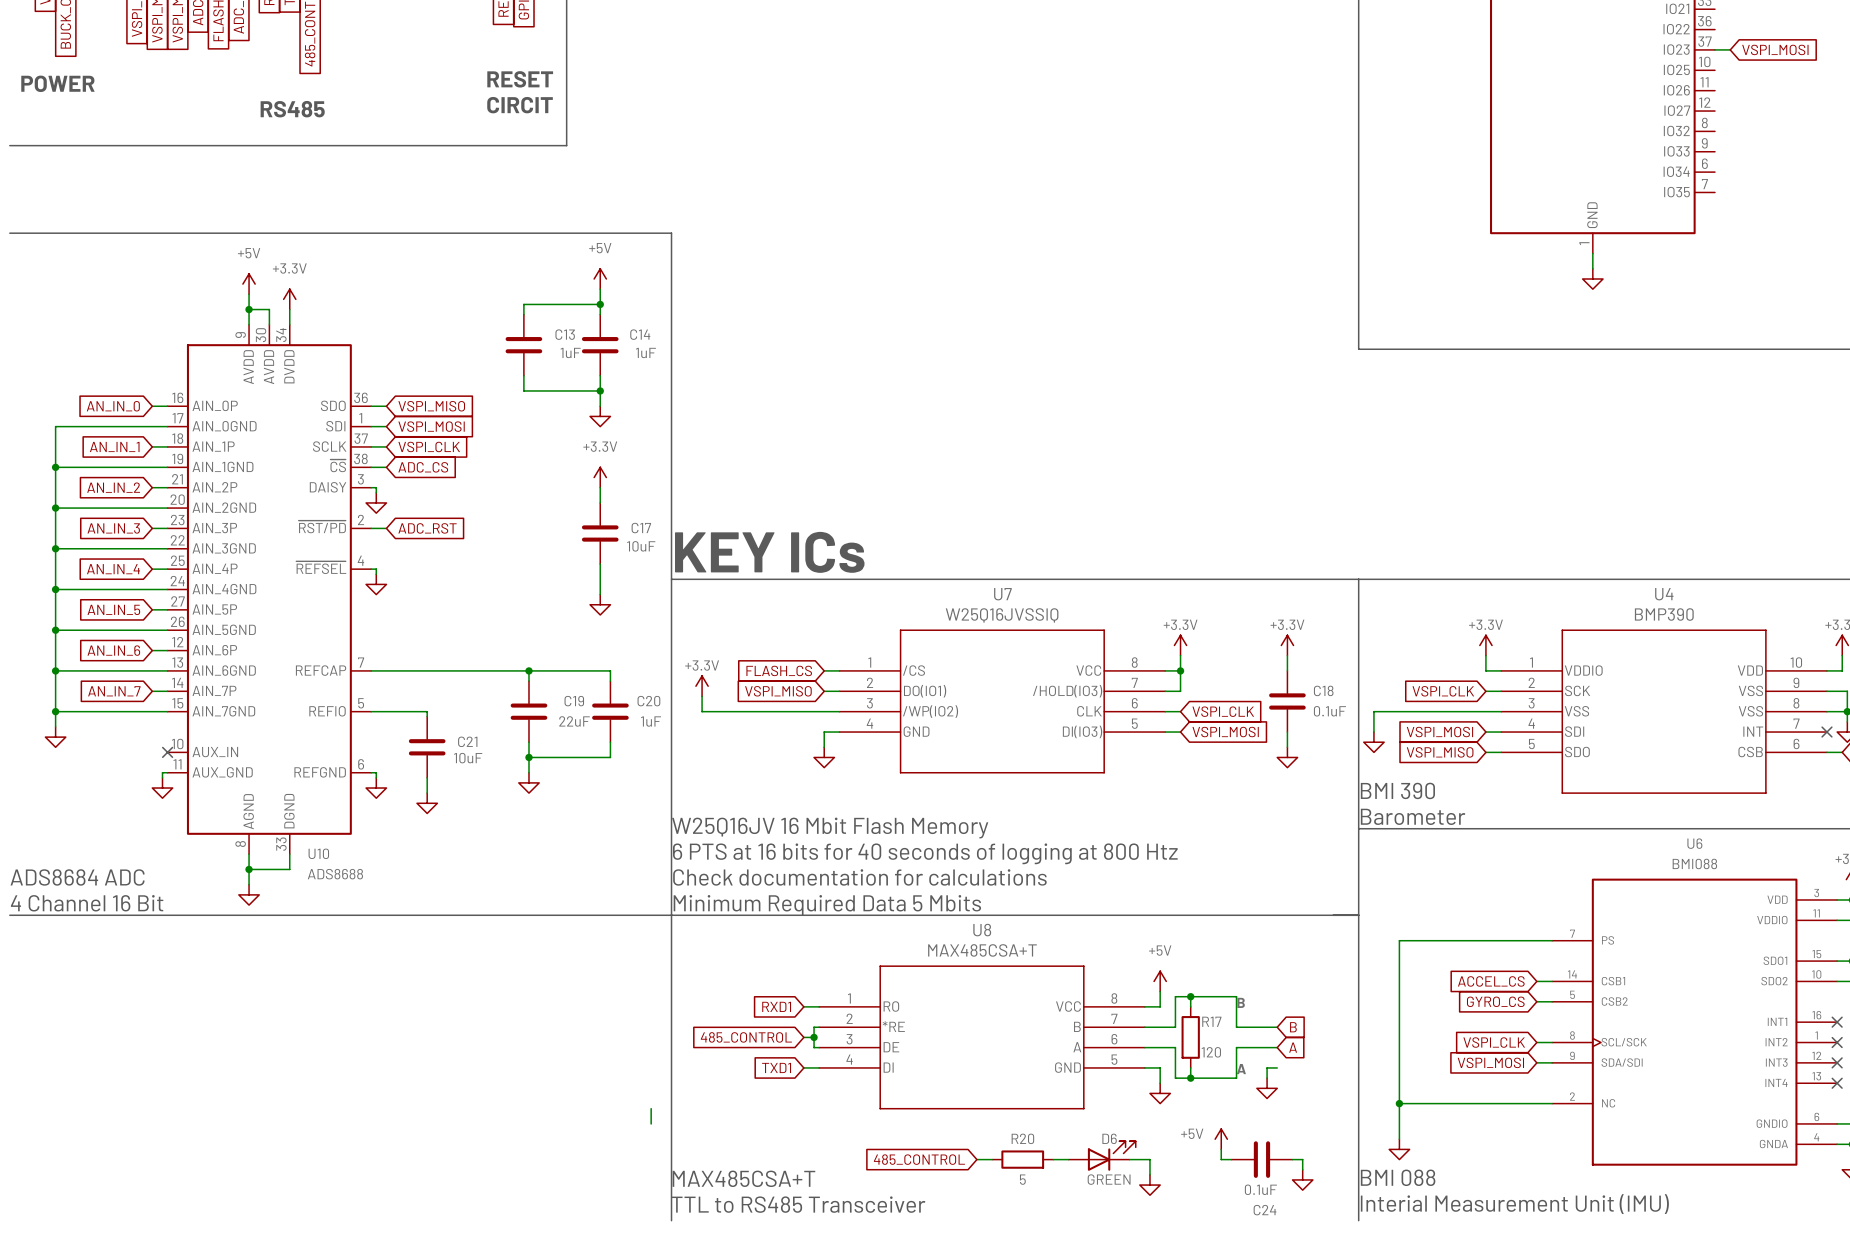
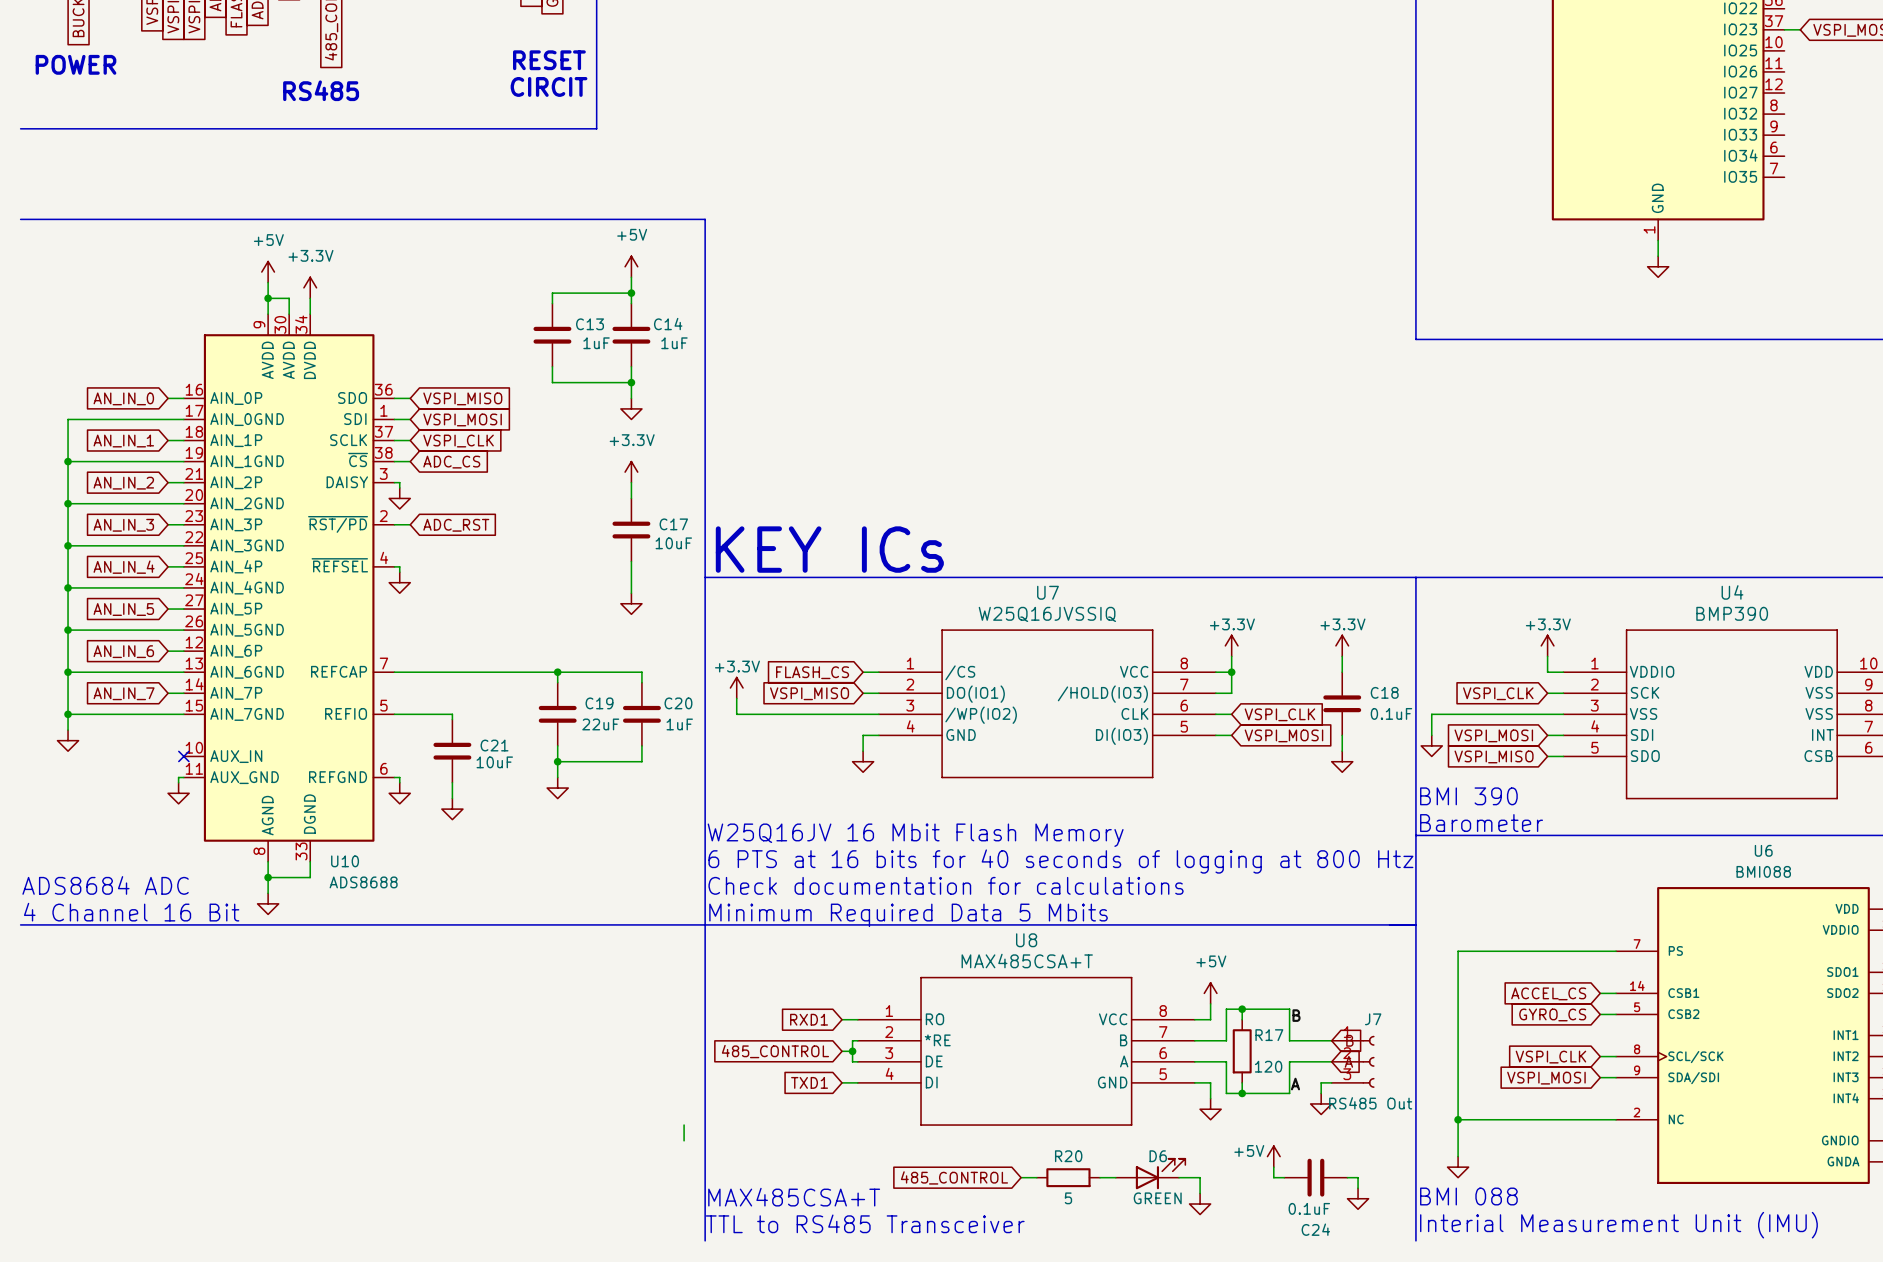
J7: none -> RS485 Out (1353, 1061)

